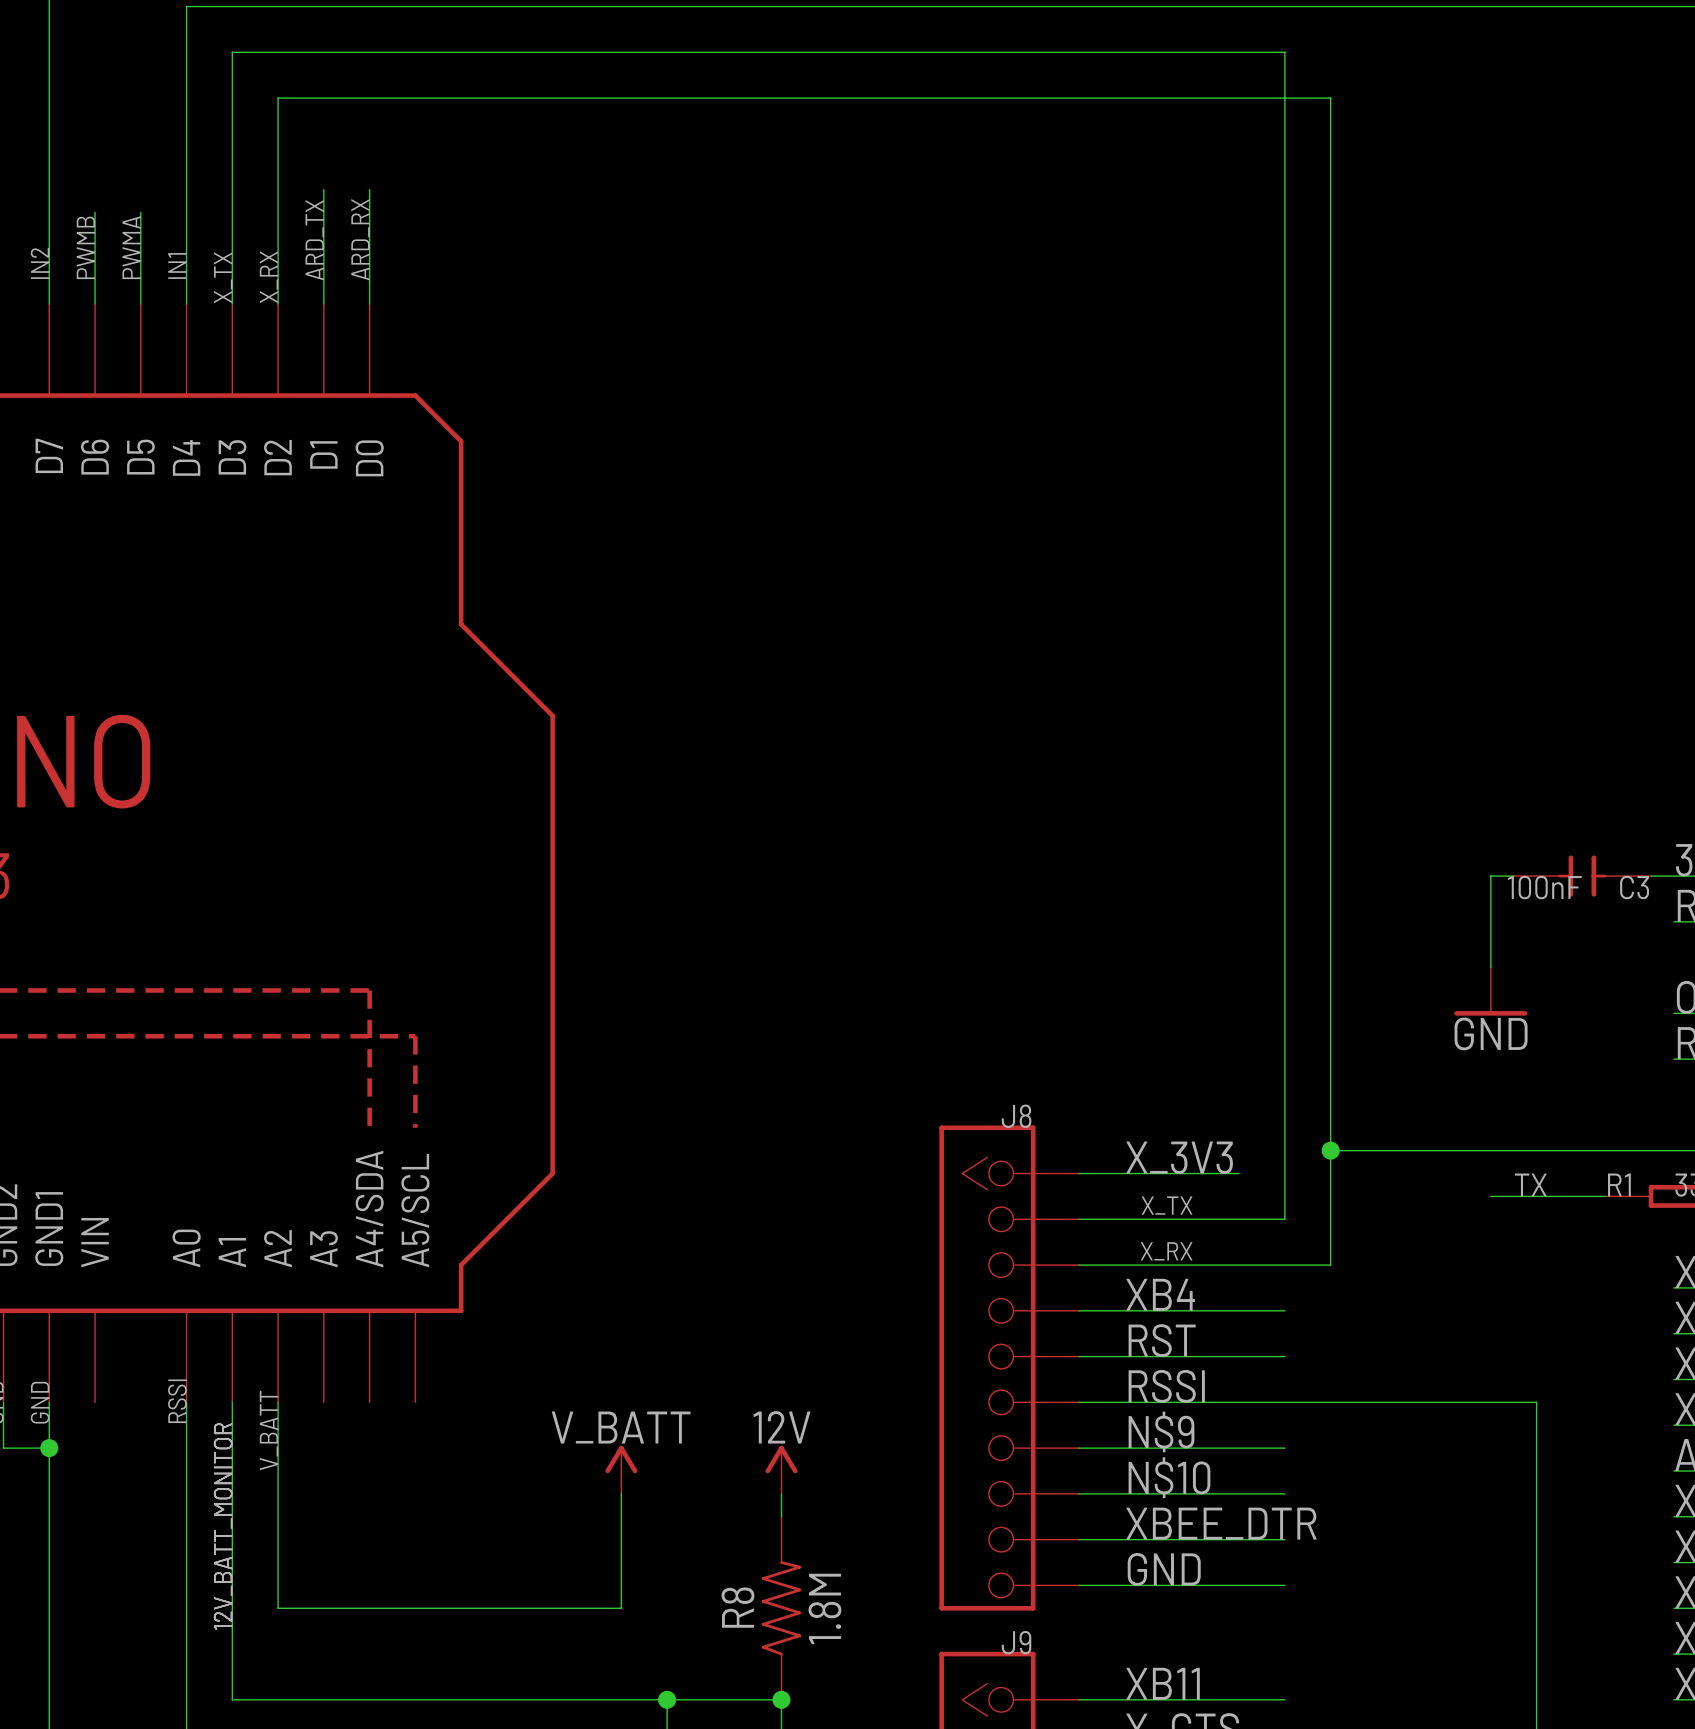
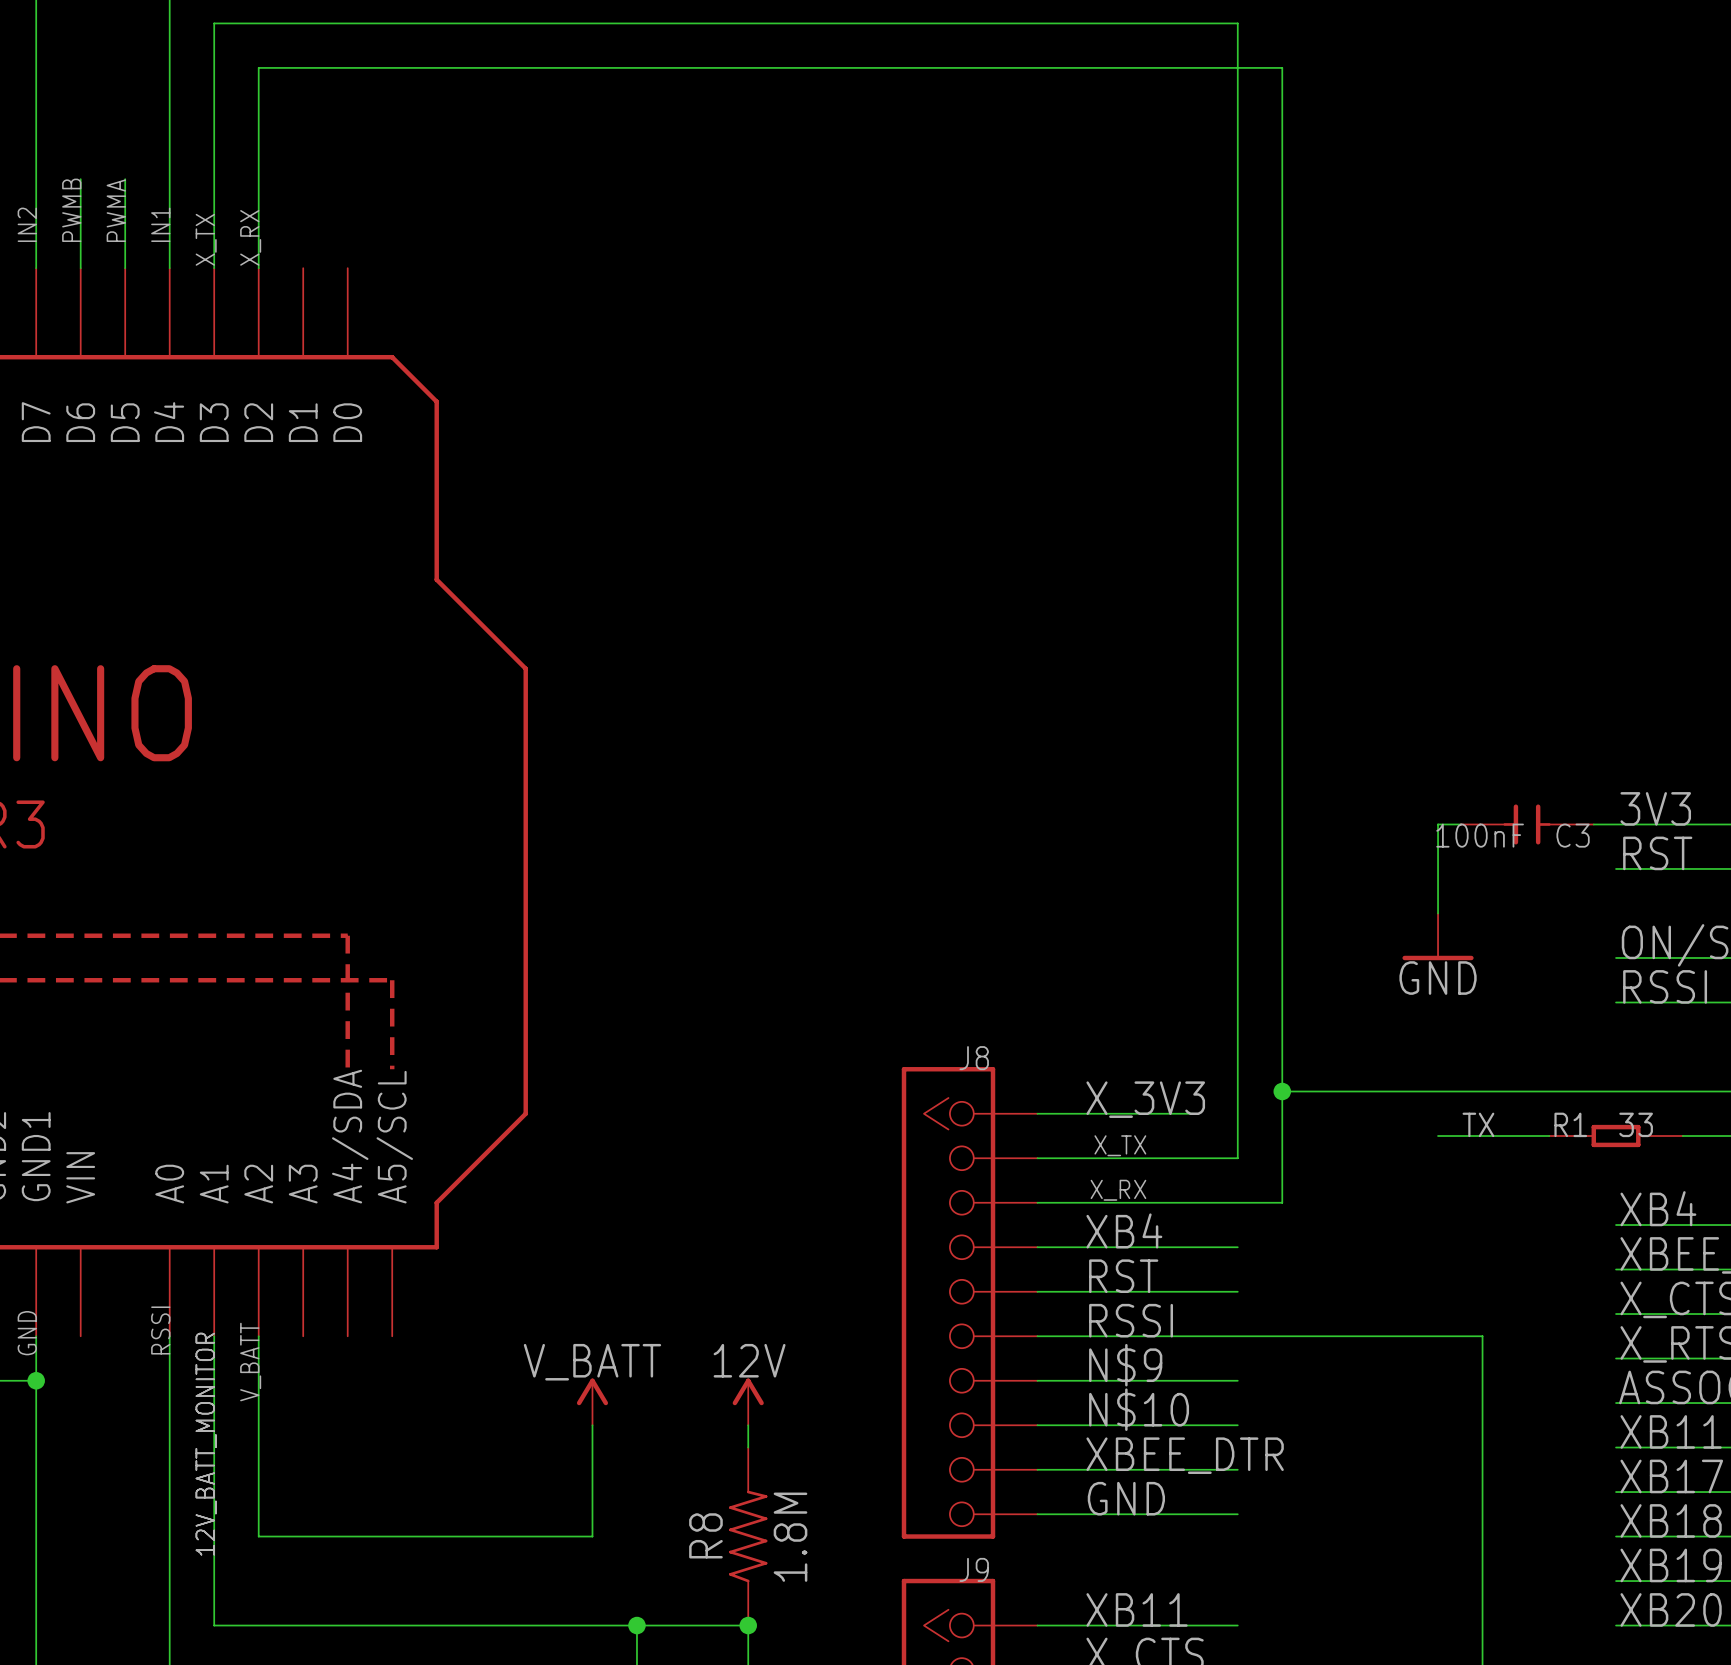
wire: (323, 189) (323, 304) -> none
wire: (369, 189) (369, 304) -> none
label: ARD_RX (360, 239) -> none
label: ARD_TX (314, 240) -> none

